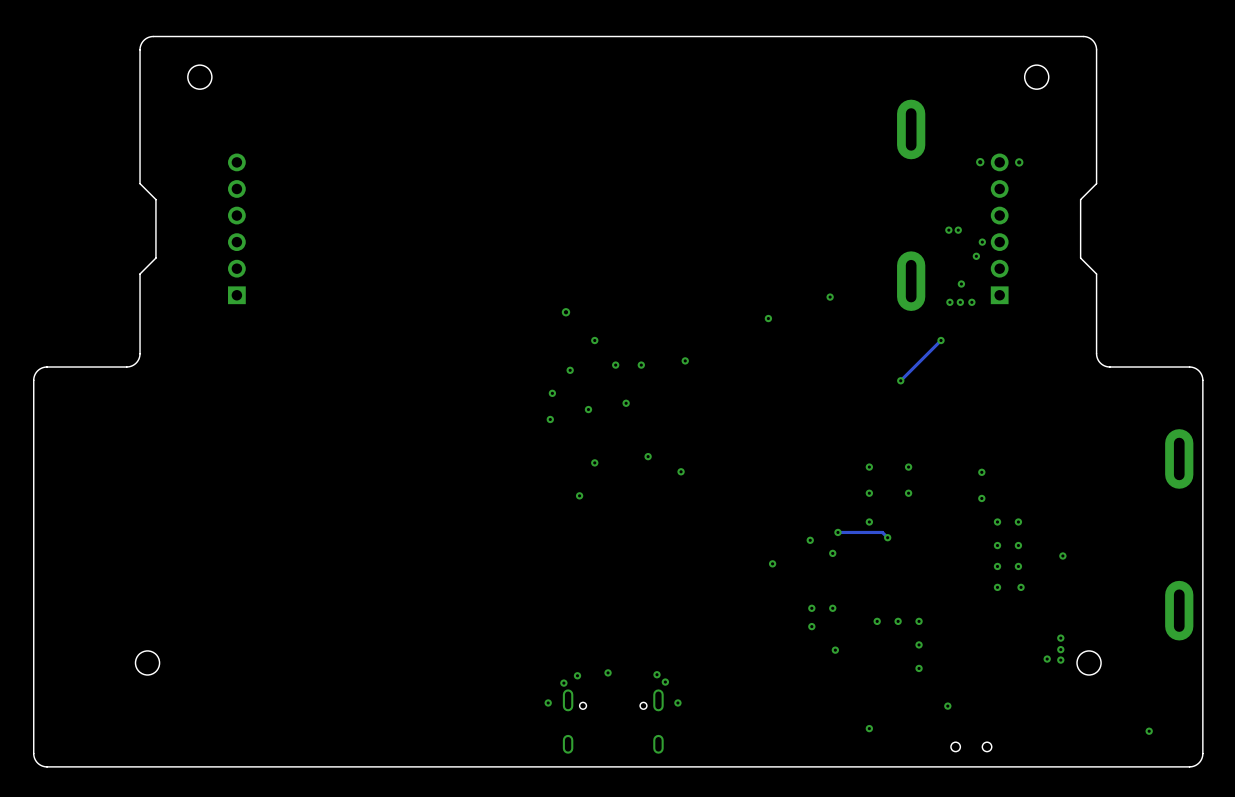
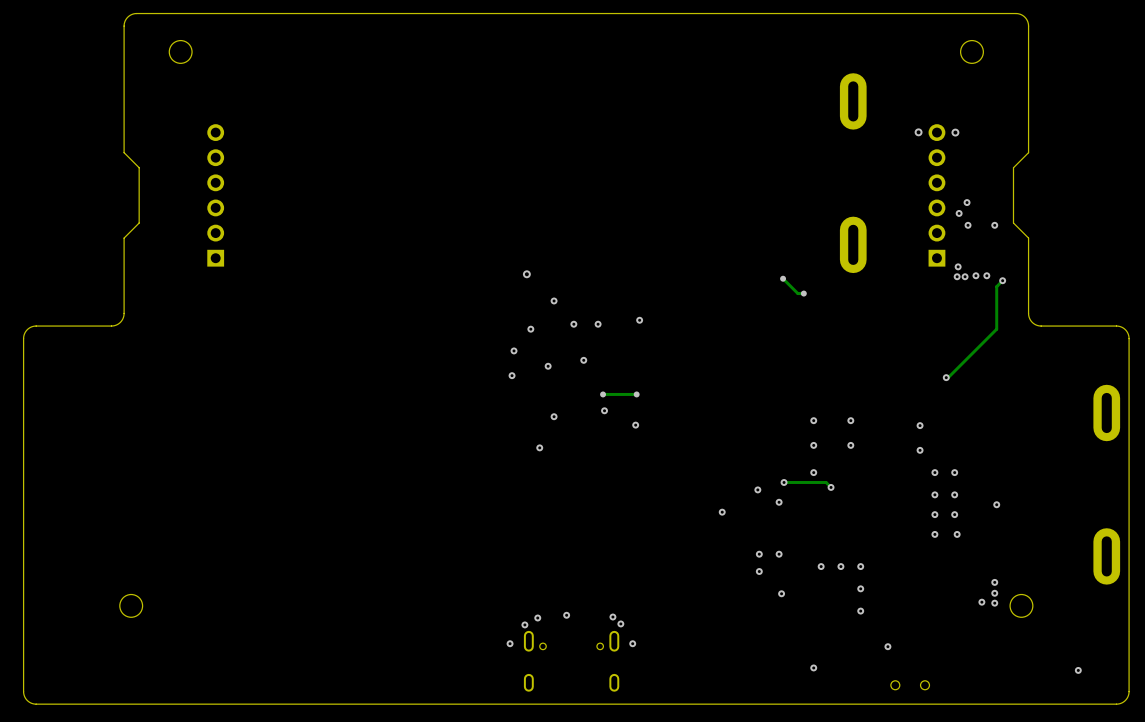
via: (948, 230) -> none
via: (958, 230) -> none
via: none -> (967, 202)
via: (982, 242) -> none
via: none -> (959, 213)
via: (976, 256) -> none
via: none -> (968, 225)
via: none -> (994, 225)
via: (961, 284) -> none
via: (830, 297) -> none
via: (949, 302) -> none
via: (960, 302) -> none
via: (971, 302) -> none
via: none -> (958, 266)
via: none -> (975, 275)
via: none -> (986, 275)
via: none -> (957, 276)
via: none -> (965, 276)
track: none -> (783, 278) (797, 293) (803, 293)
via: none -> (783, 278)
via: (768, 318) -> none
track: none -> (1002, 280) (996, 286) (996, 329) (946, 377)
via: none -> (1002, 280)
via: none -> (803, 293)
track: (941, 340) (900, 380) -> none
via: (941, 340) -> none
via: (900, 380) -> none
via: none -> (946, 377)
via: none -> (603, 394)
track: none -> (636, 394) (603, 394)
via: none -> (636, 394)

